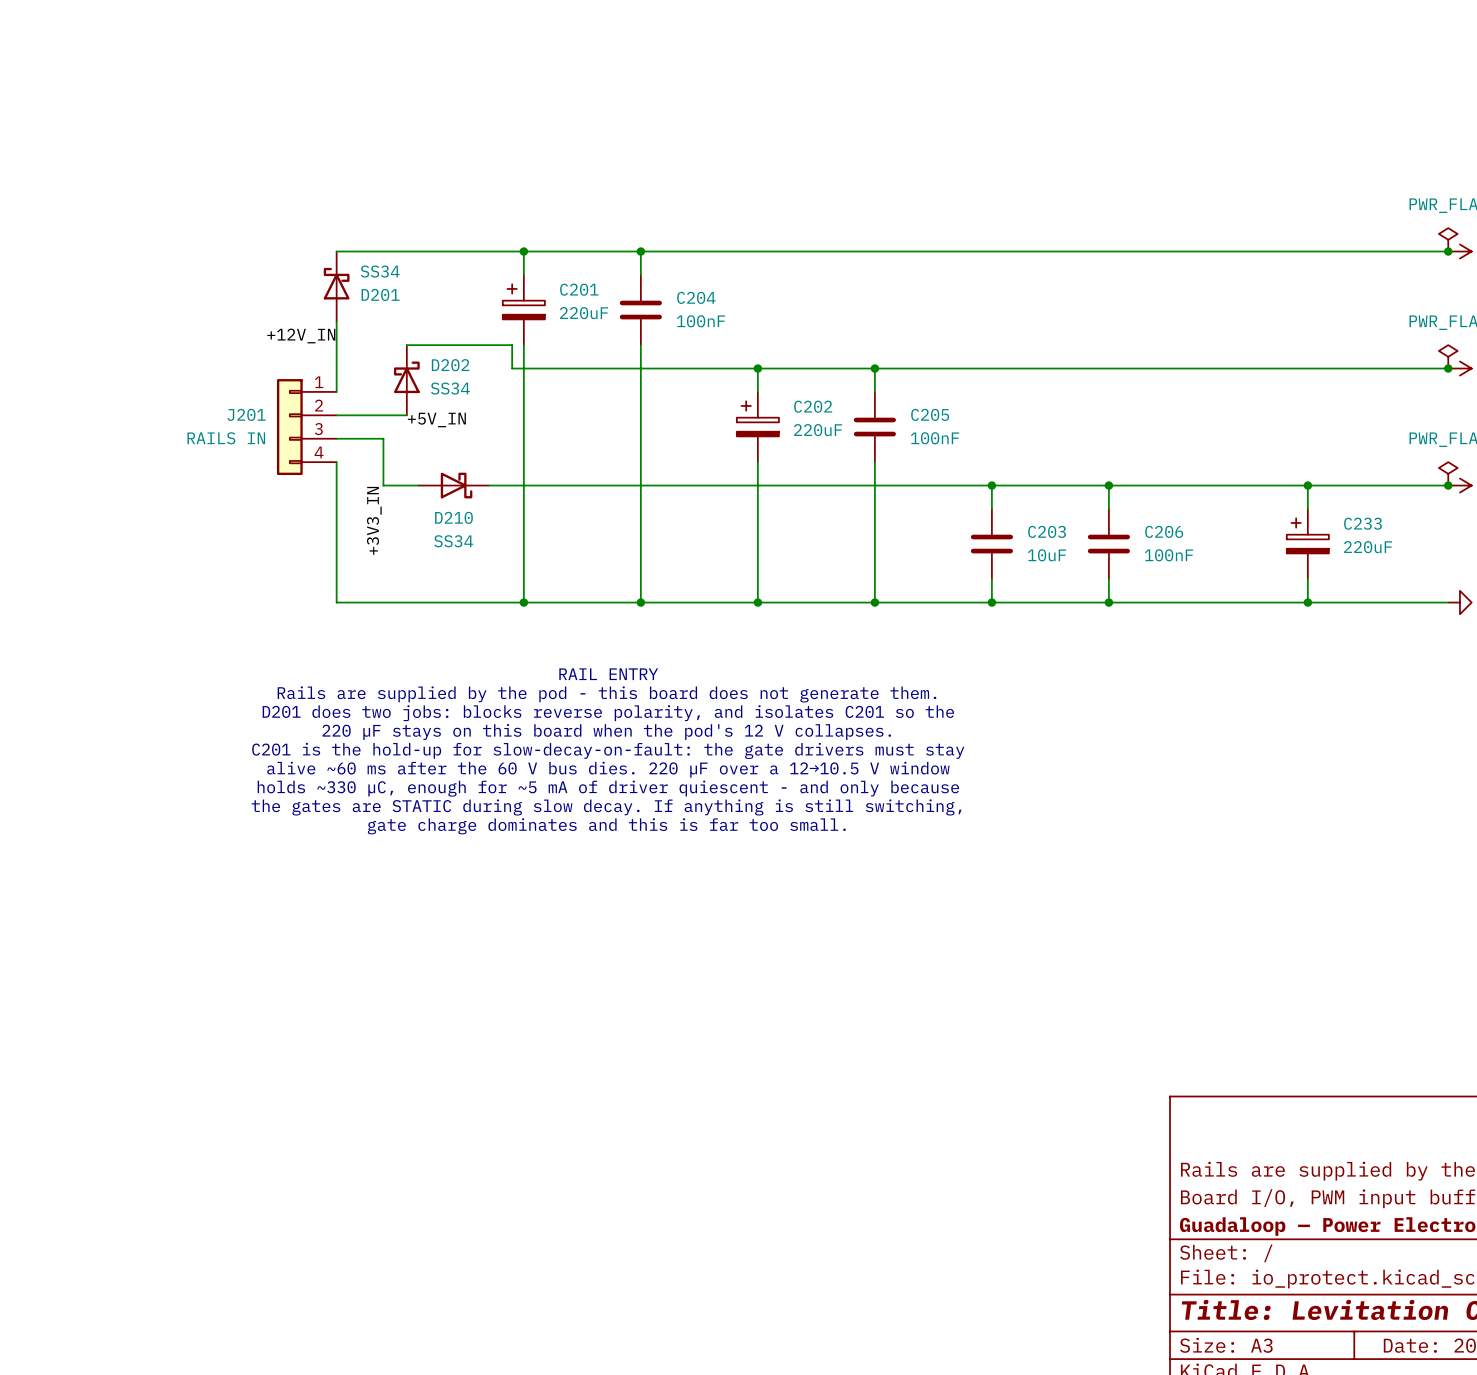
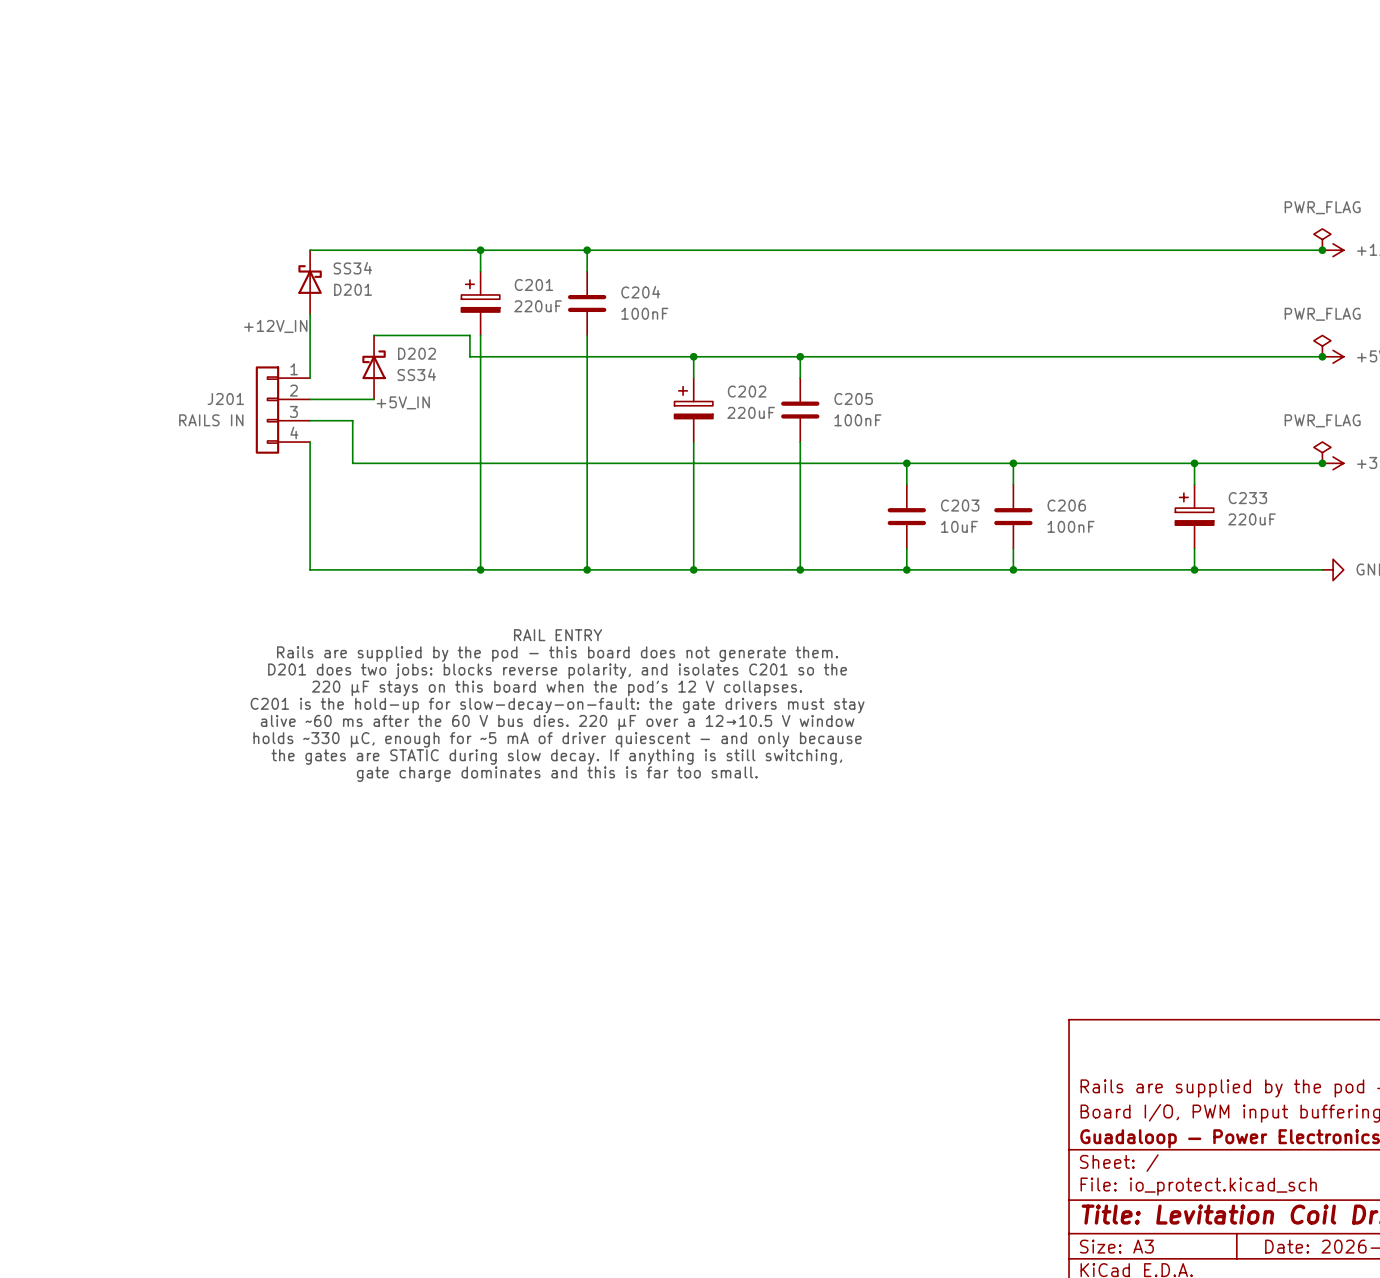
D210: SS34 (453, 485) -> none
label: +3V3_IN (374, 520) -> none

